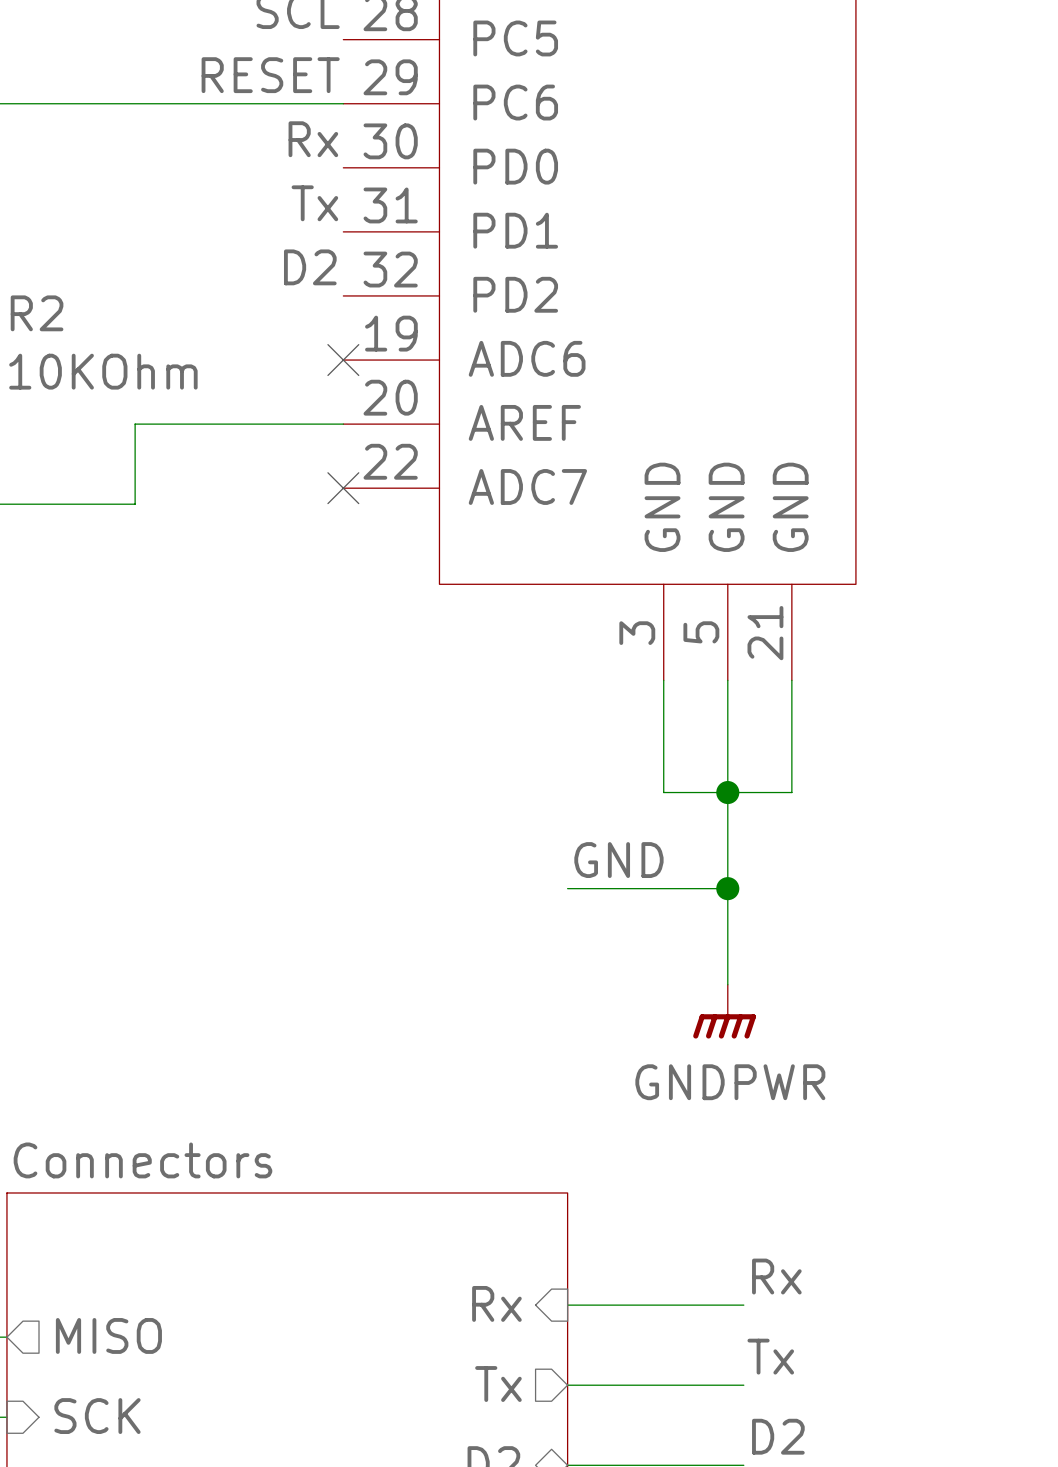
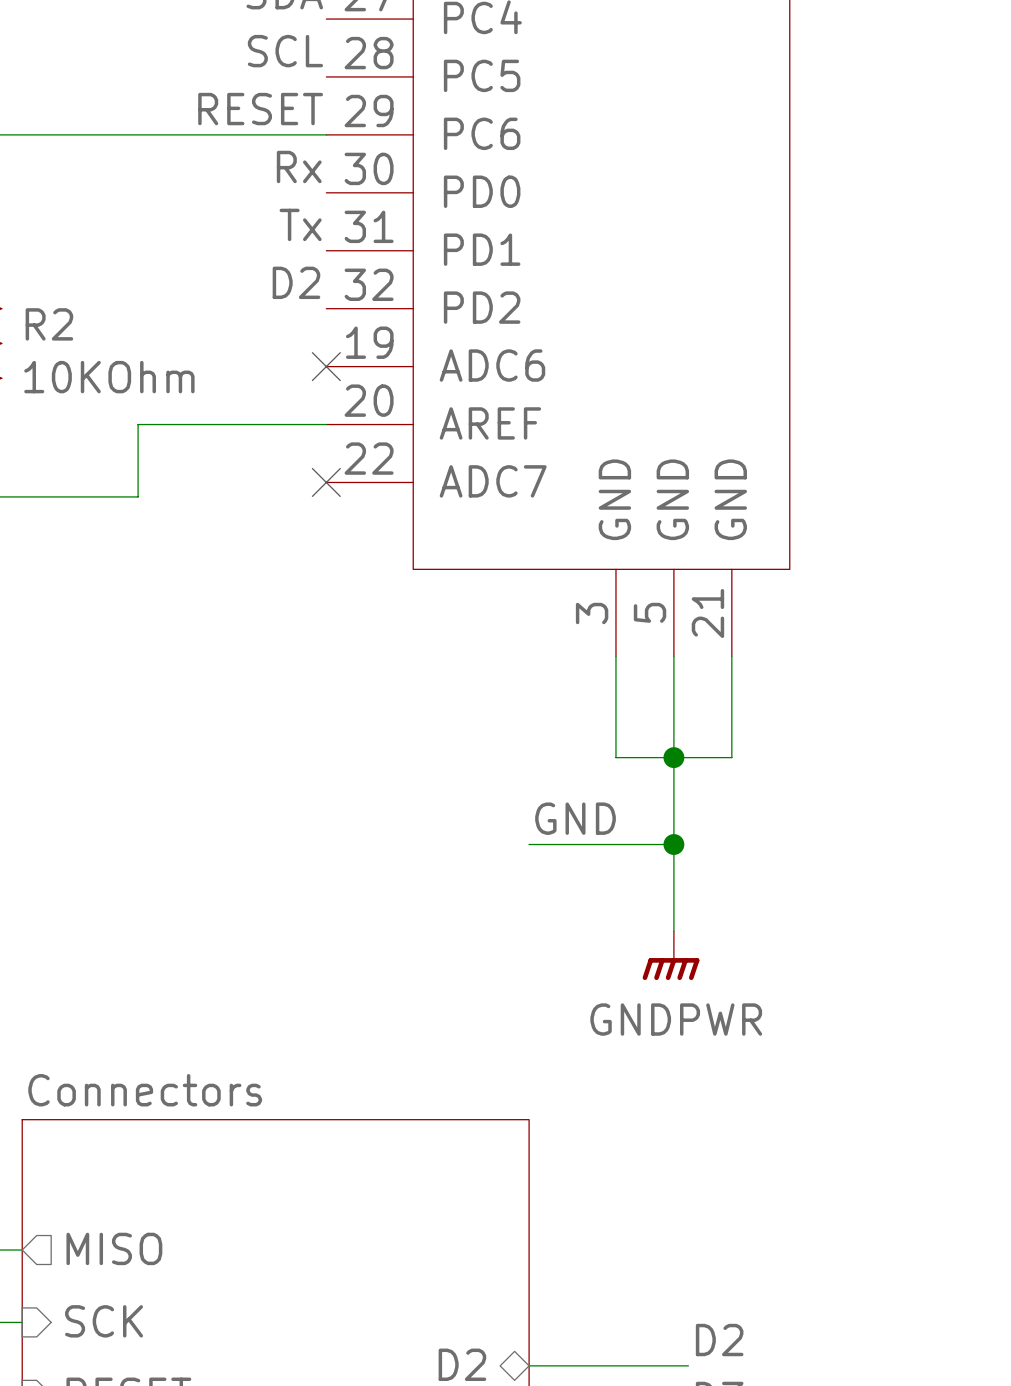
label: Rx (776, 1276) -> none
sheet pin: Rx (496, 1303) -> none
wire: (567, 1305) (743, 1305) -> none
label: Tx (770, 1356) -> none
sheet pin: Tx (498, 1384) -> none
wire: (567, 1385) (743, 1385) -> none

